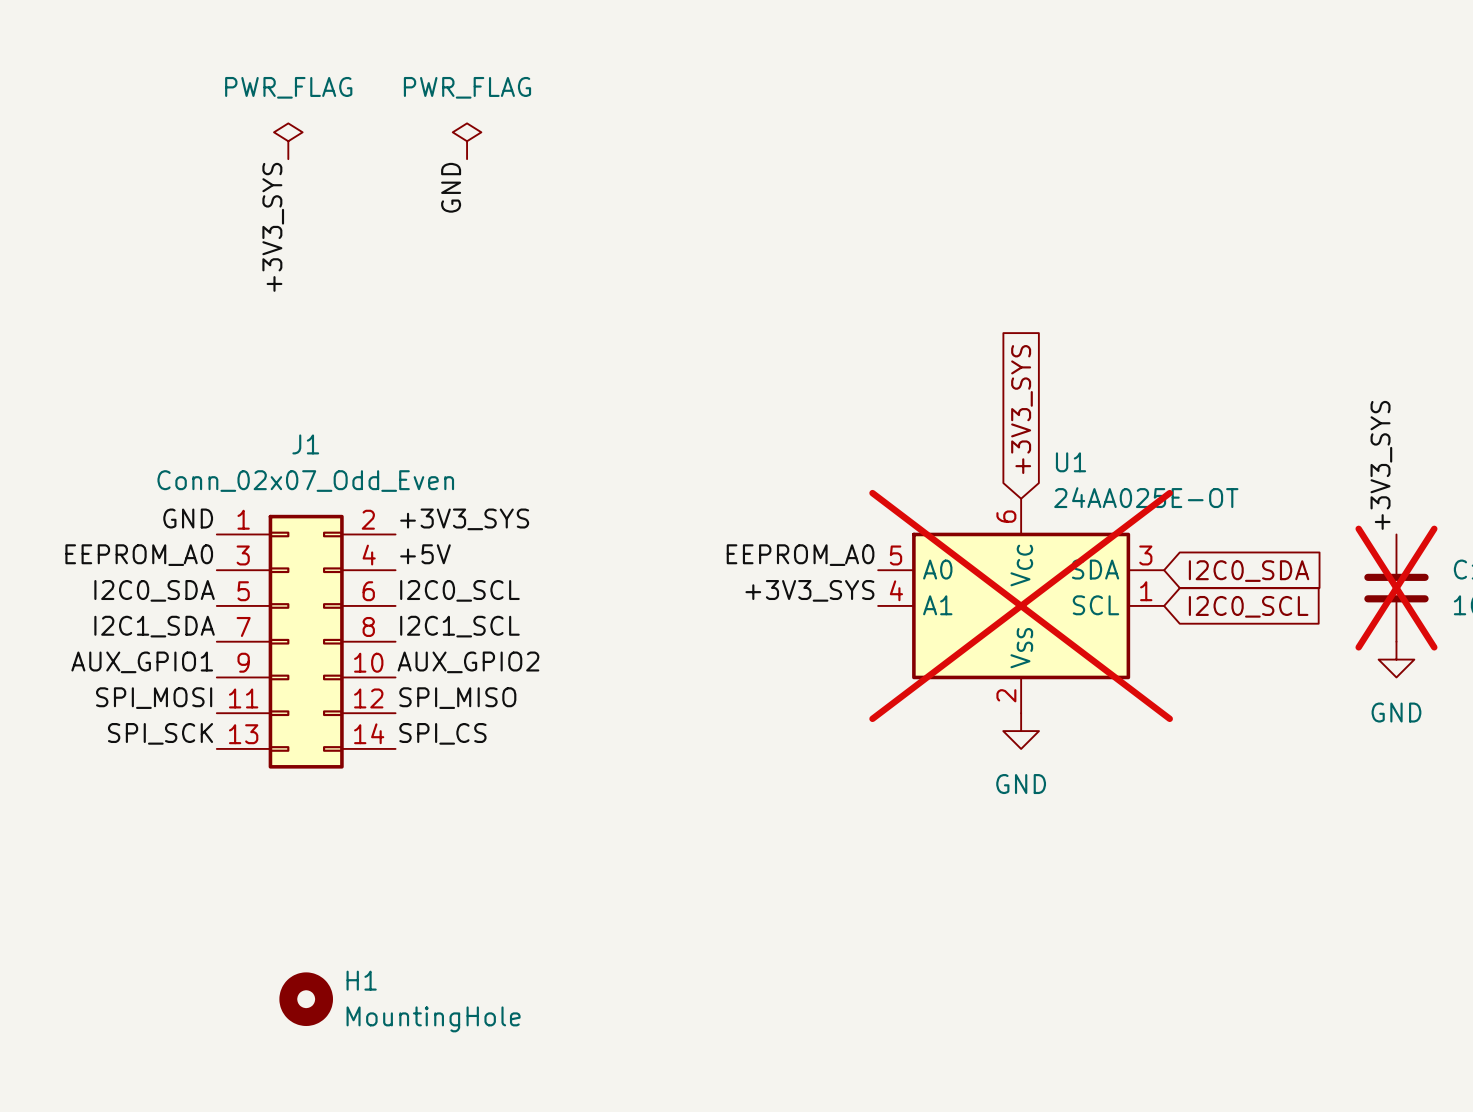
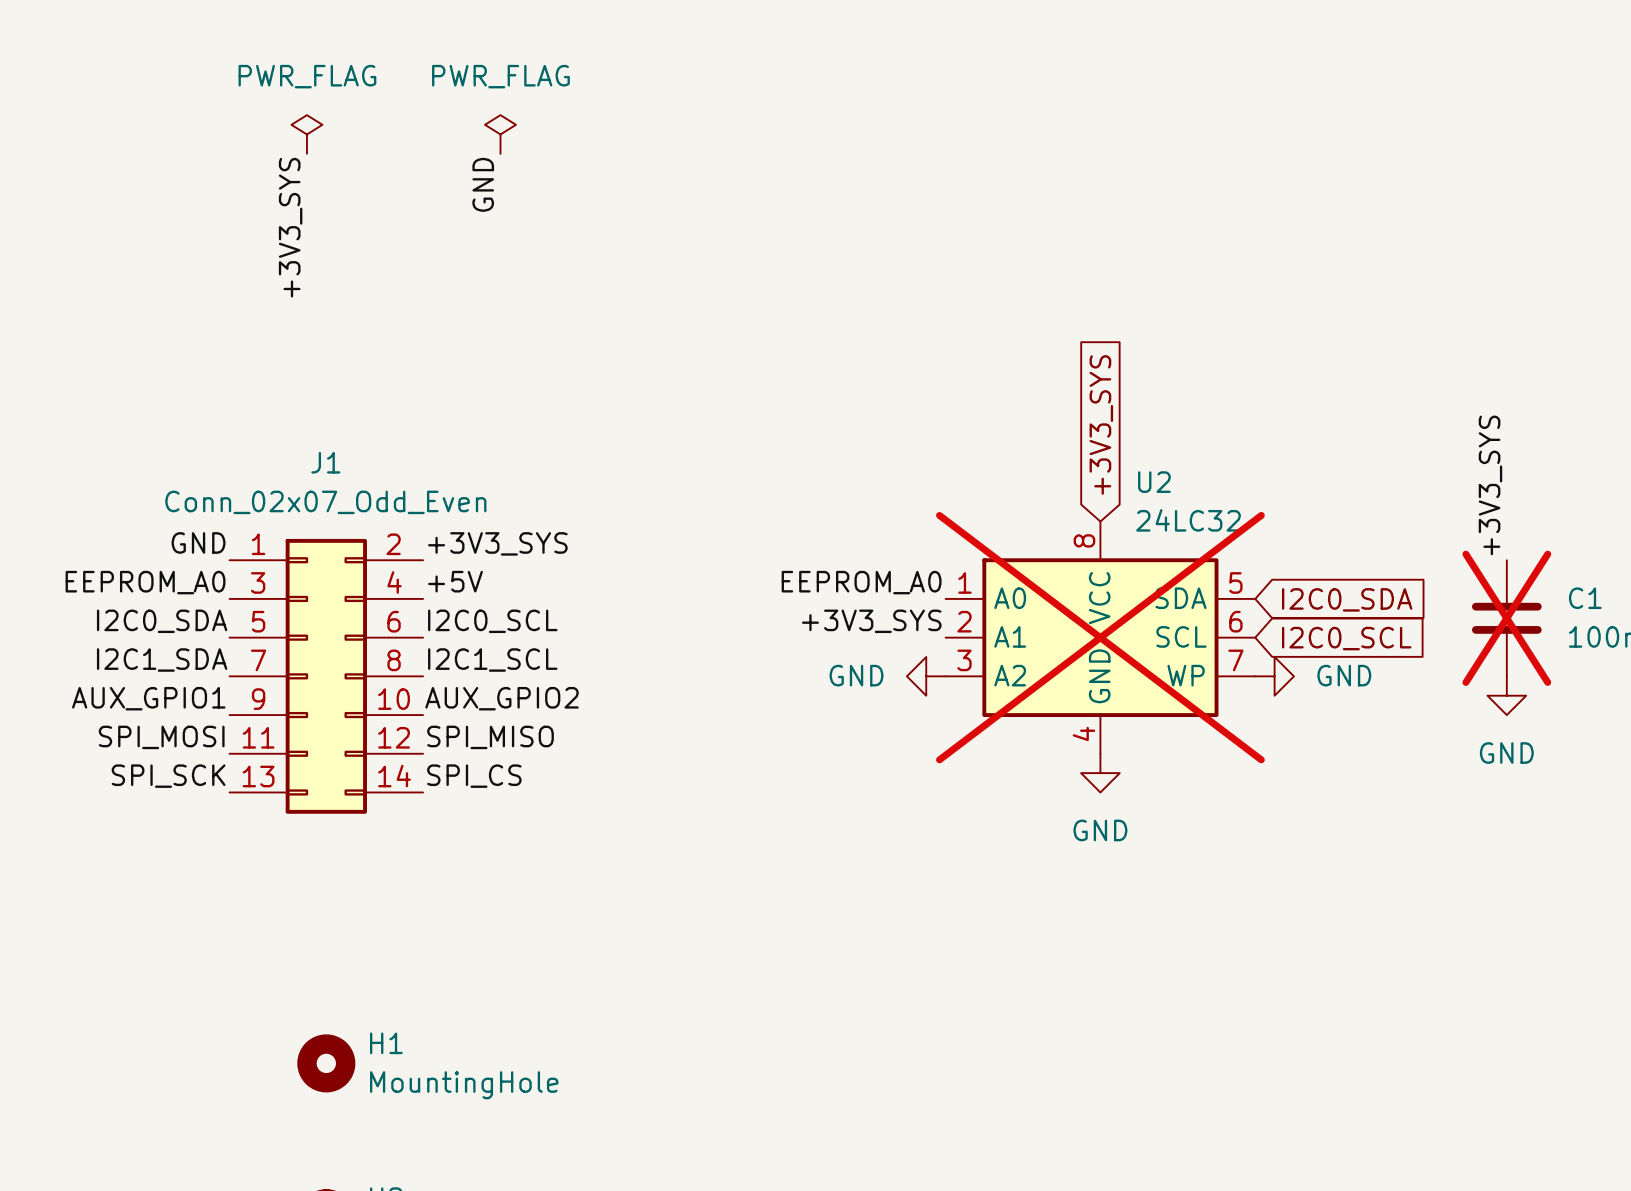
U1: 24AA025E-OT (1021, 605) -> none
U2: none -> 24LC32 (1100, 637)
power symbol: none -> GND (926, 676)
power symbol: none -> GND (1274, 676)

